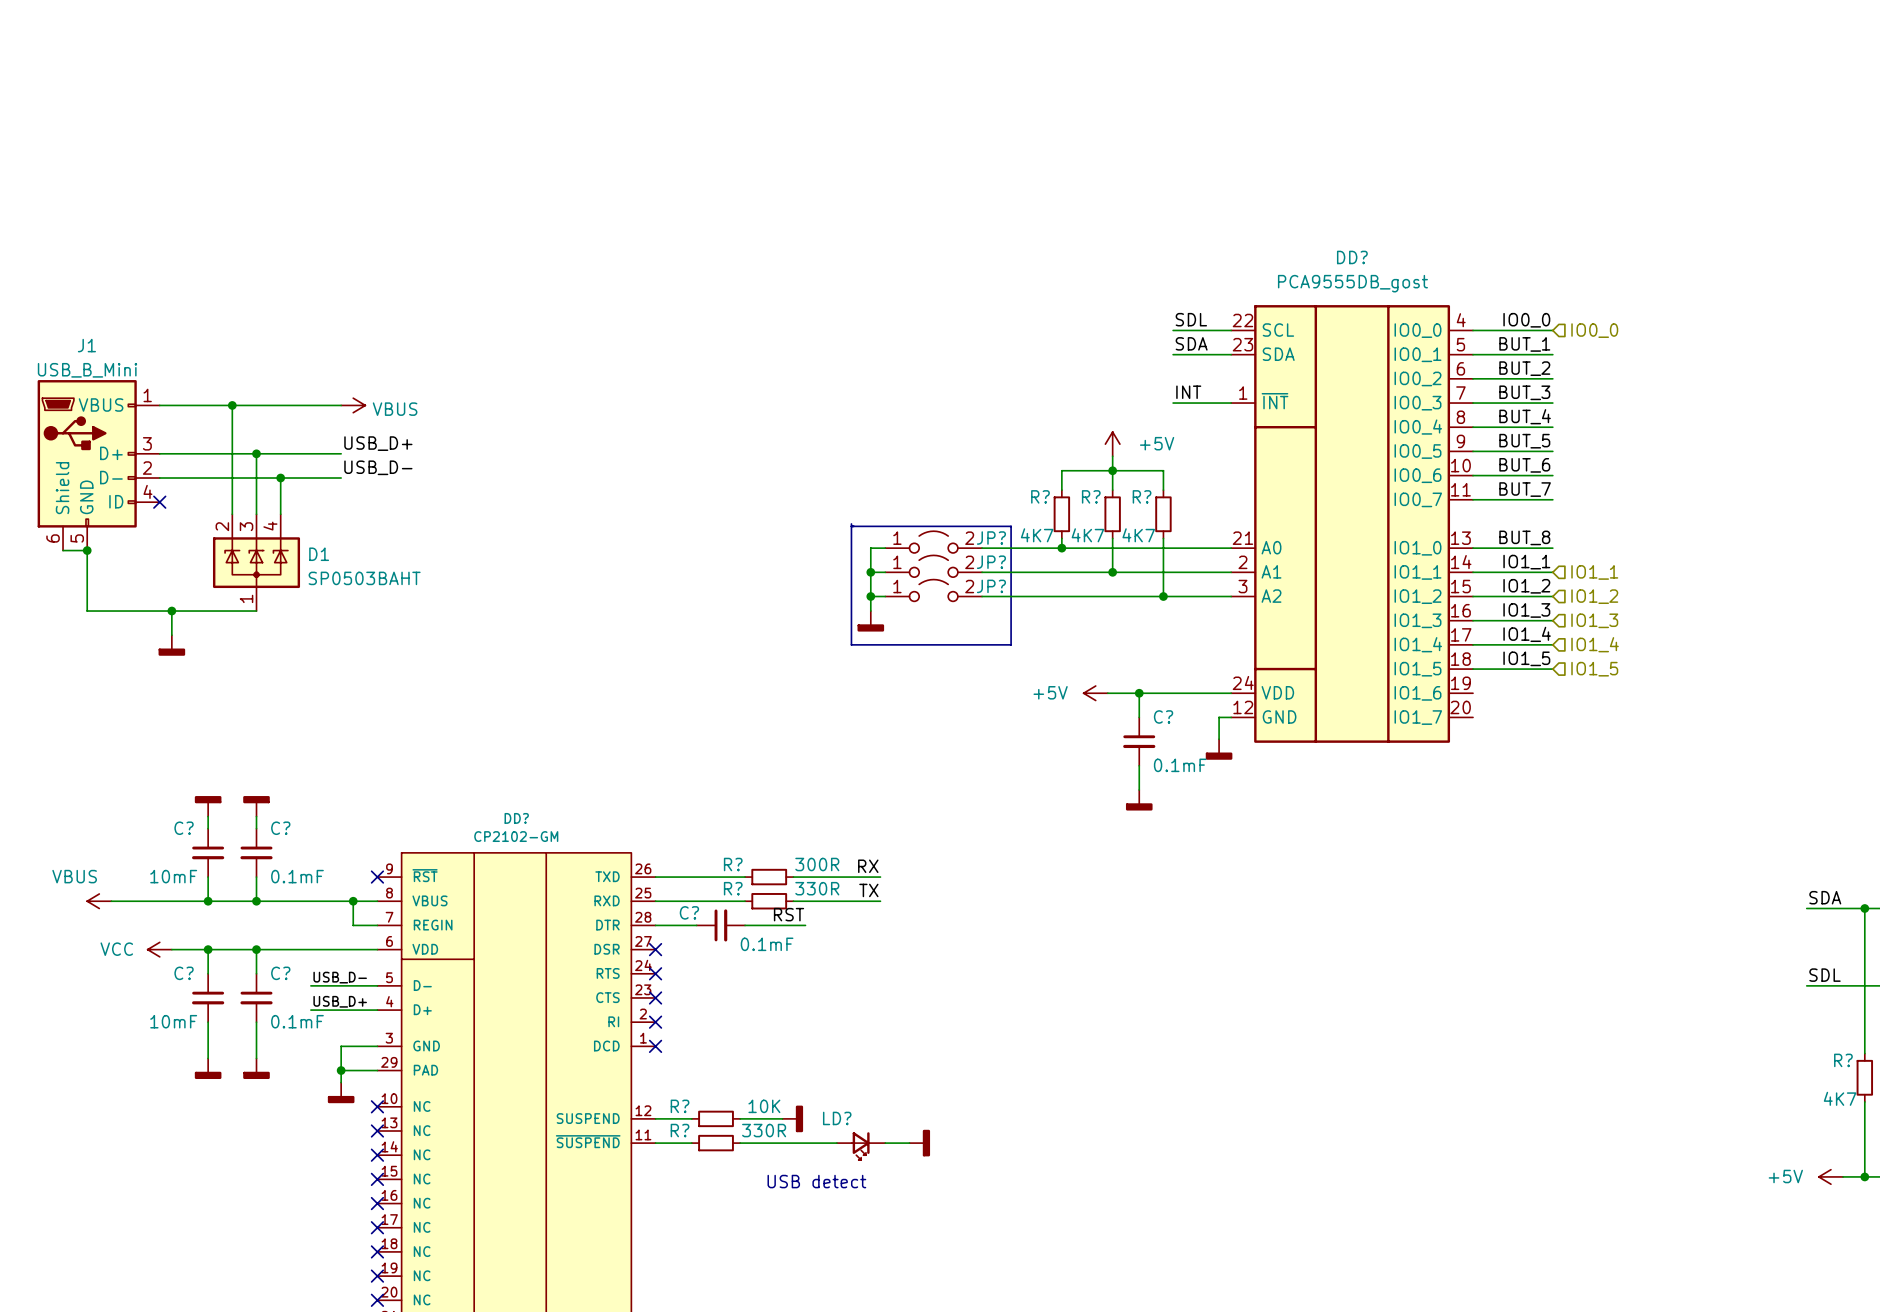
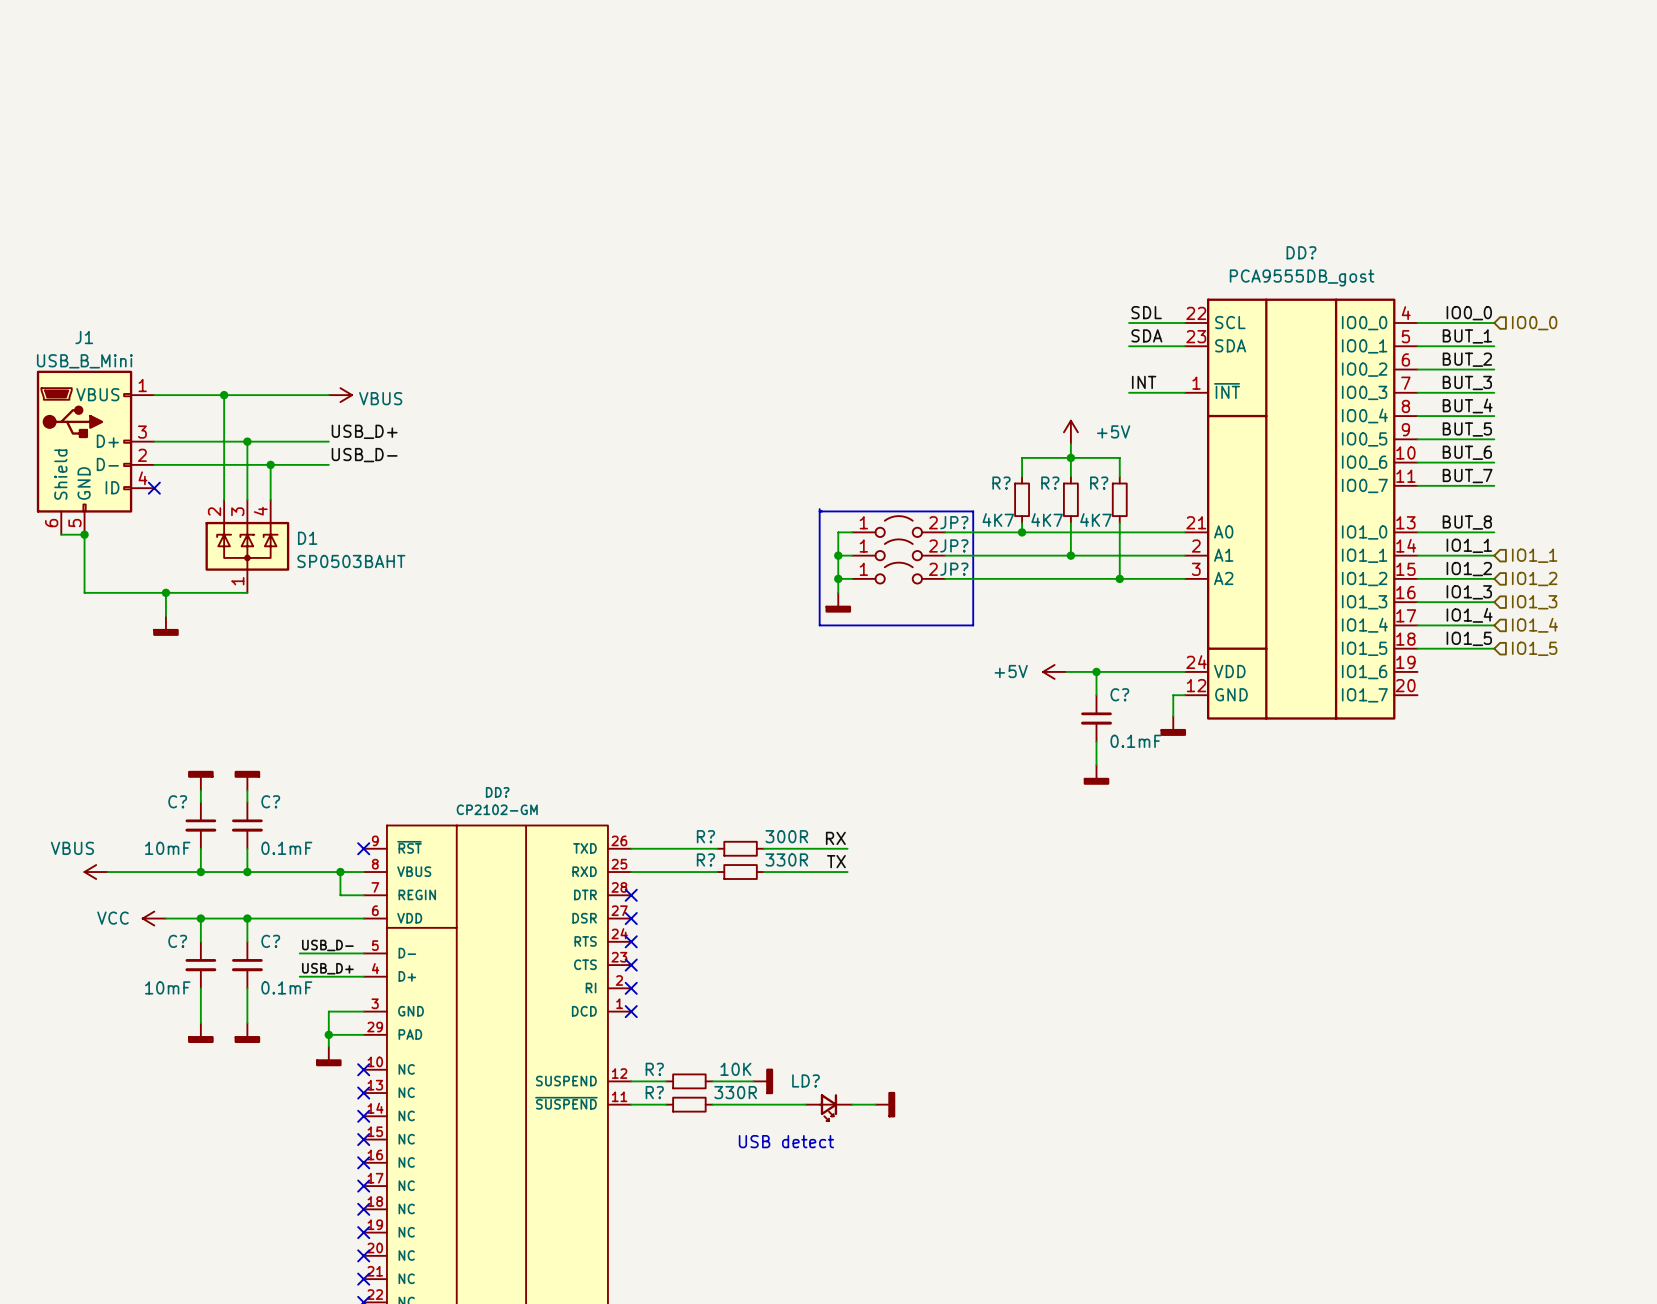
label: RST (789, 914) -> none
wire: (655, 925) (696, 925) -> none
no-connect mark: none -> (631, 895)
C?: 0.1mF (720, 925) -> none
wire: (745, 925) (805, 925) -> none

